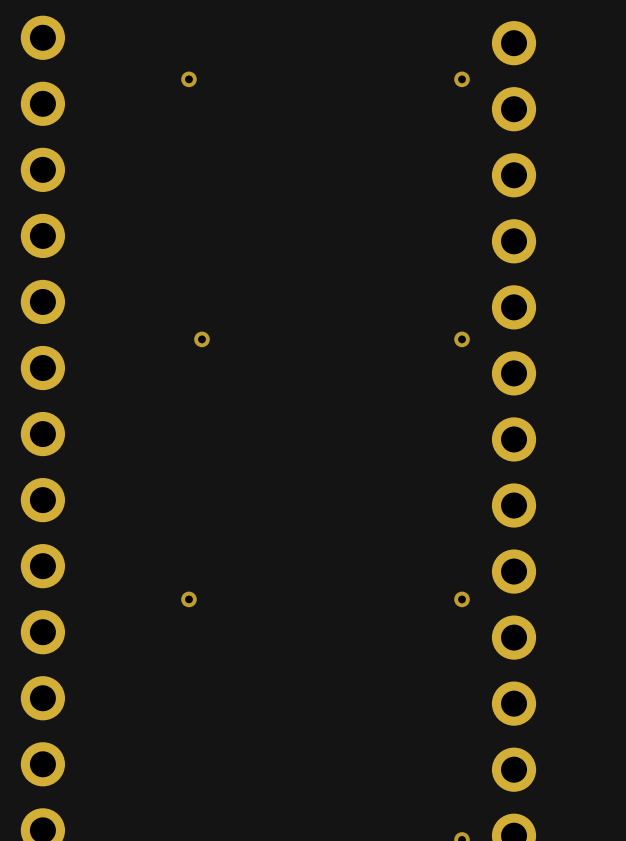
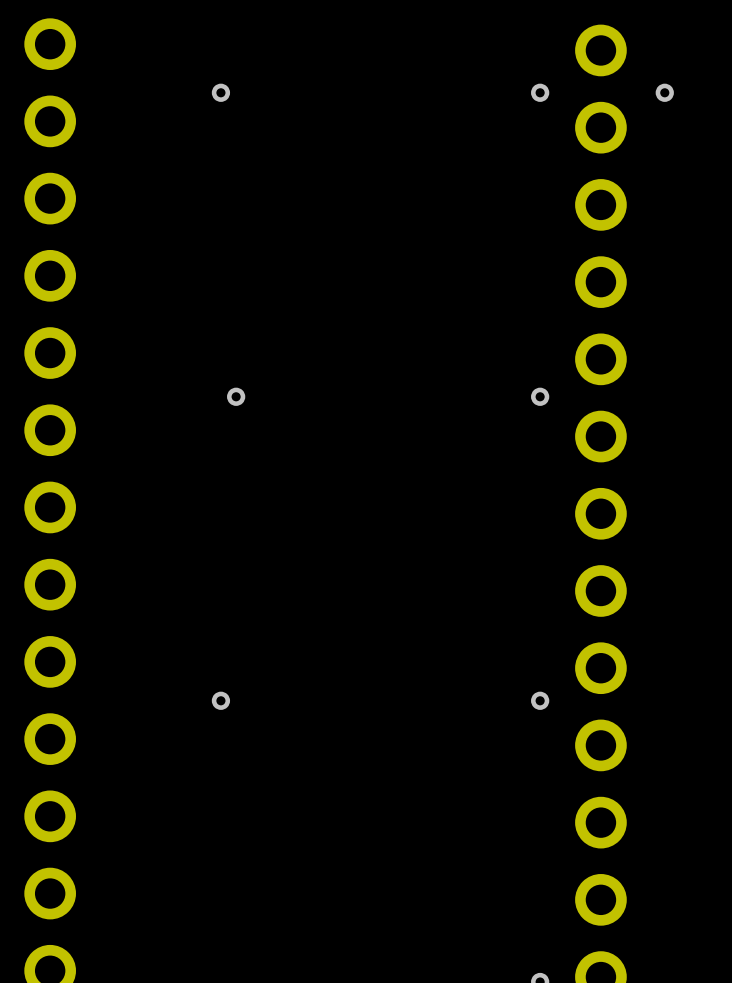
via: none -> (664, 92)

